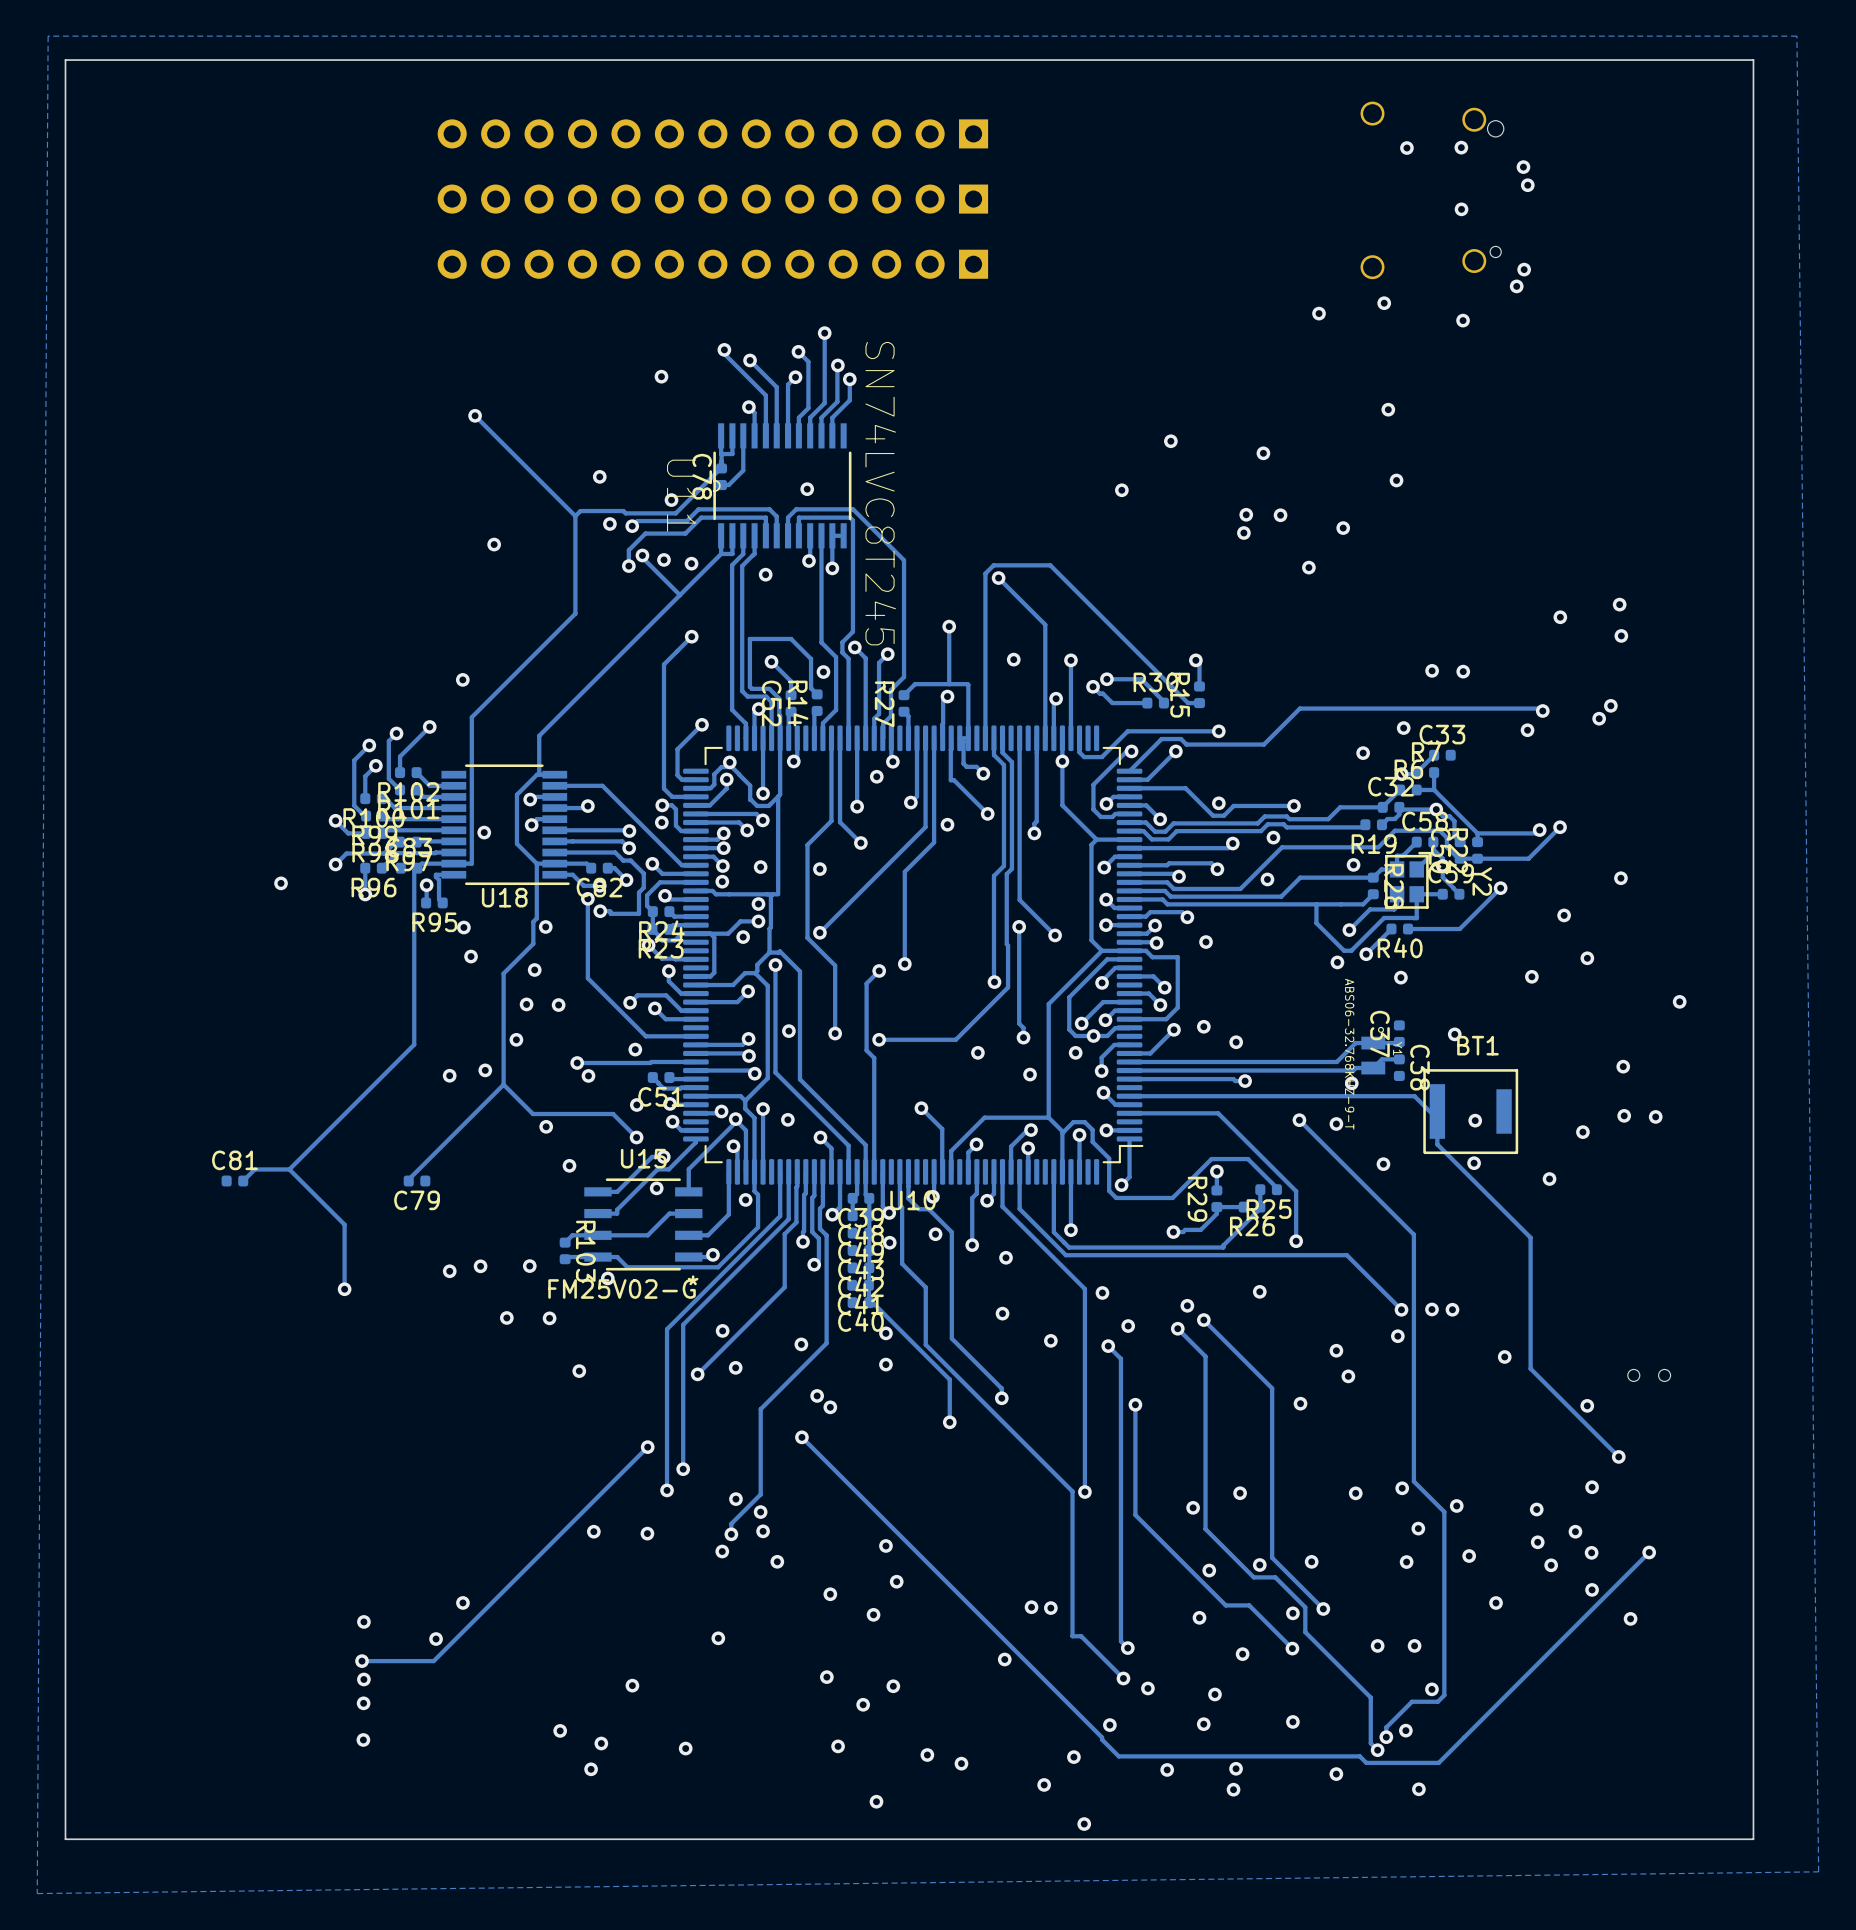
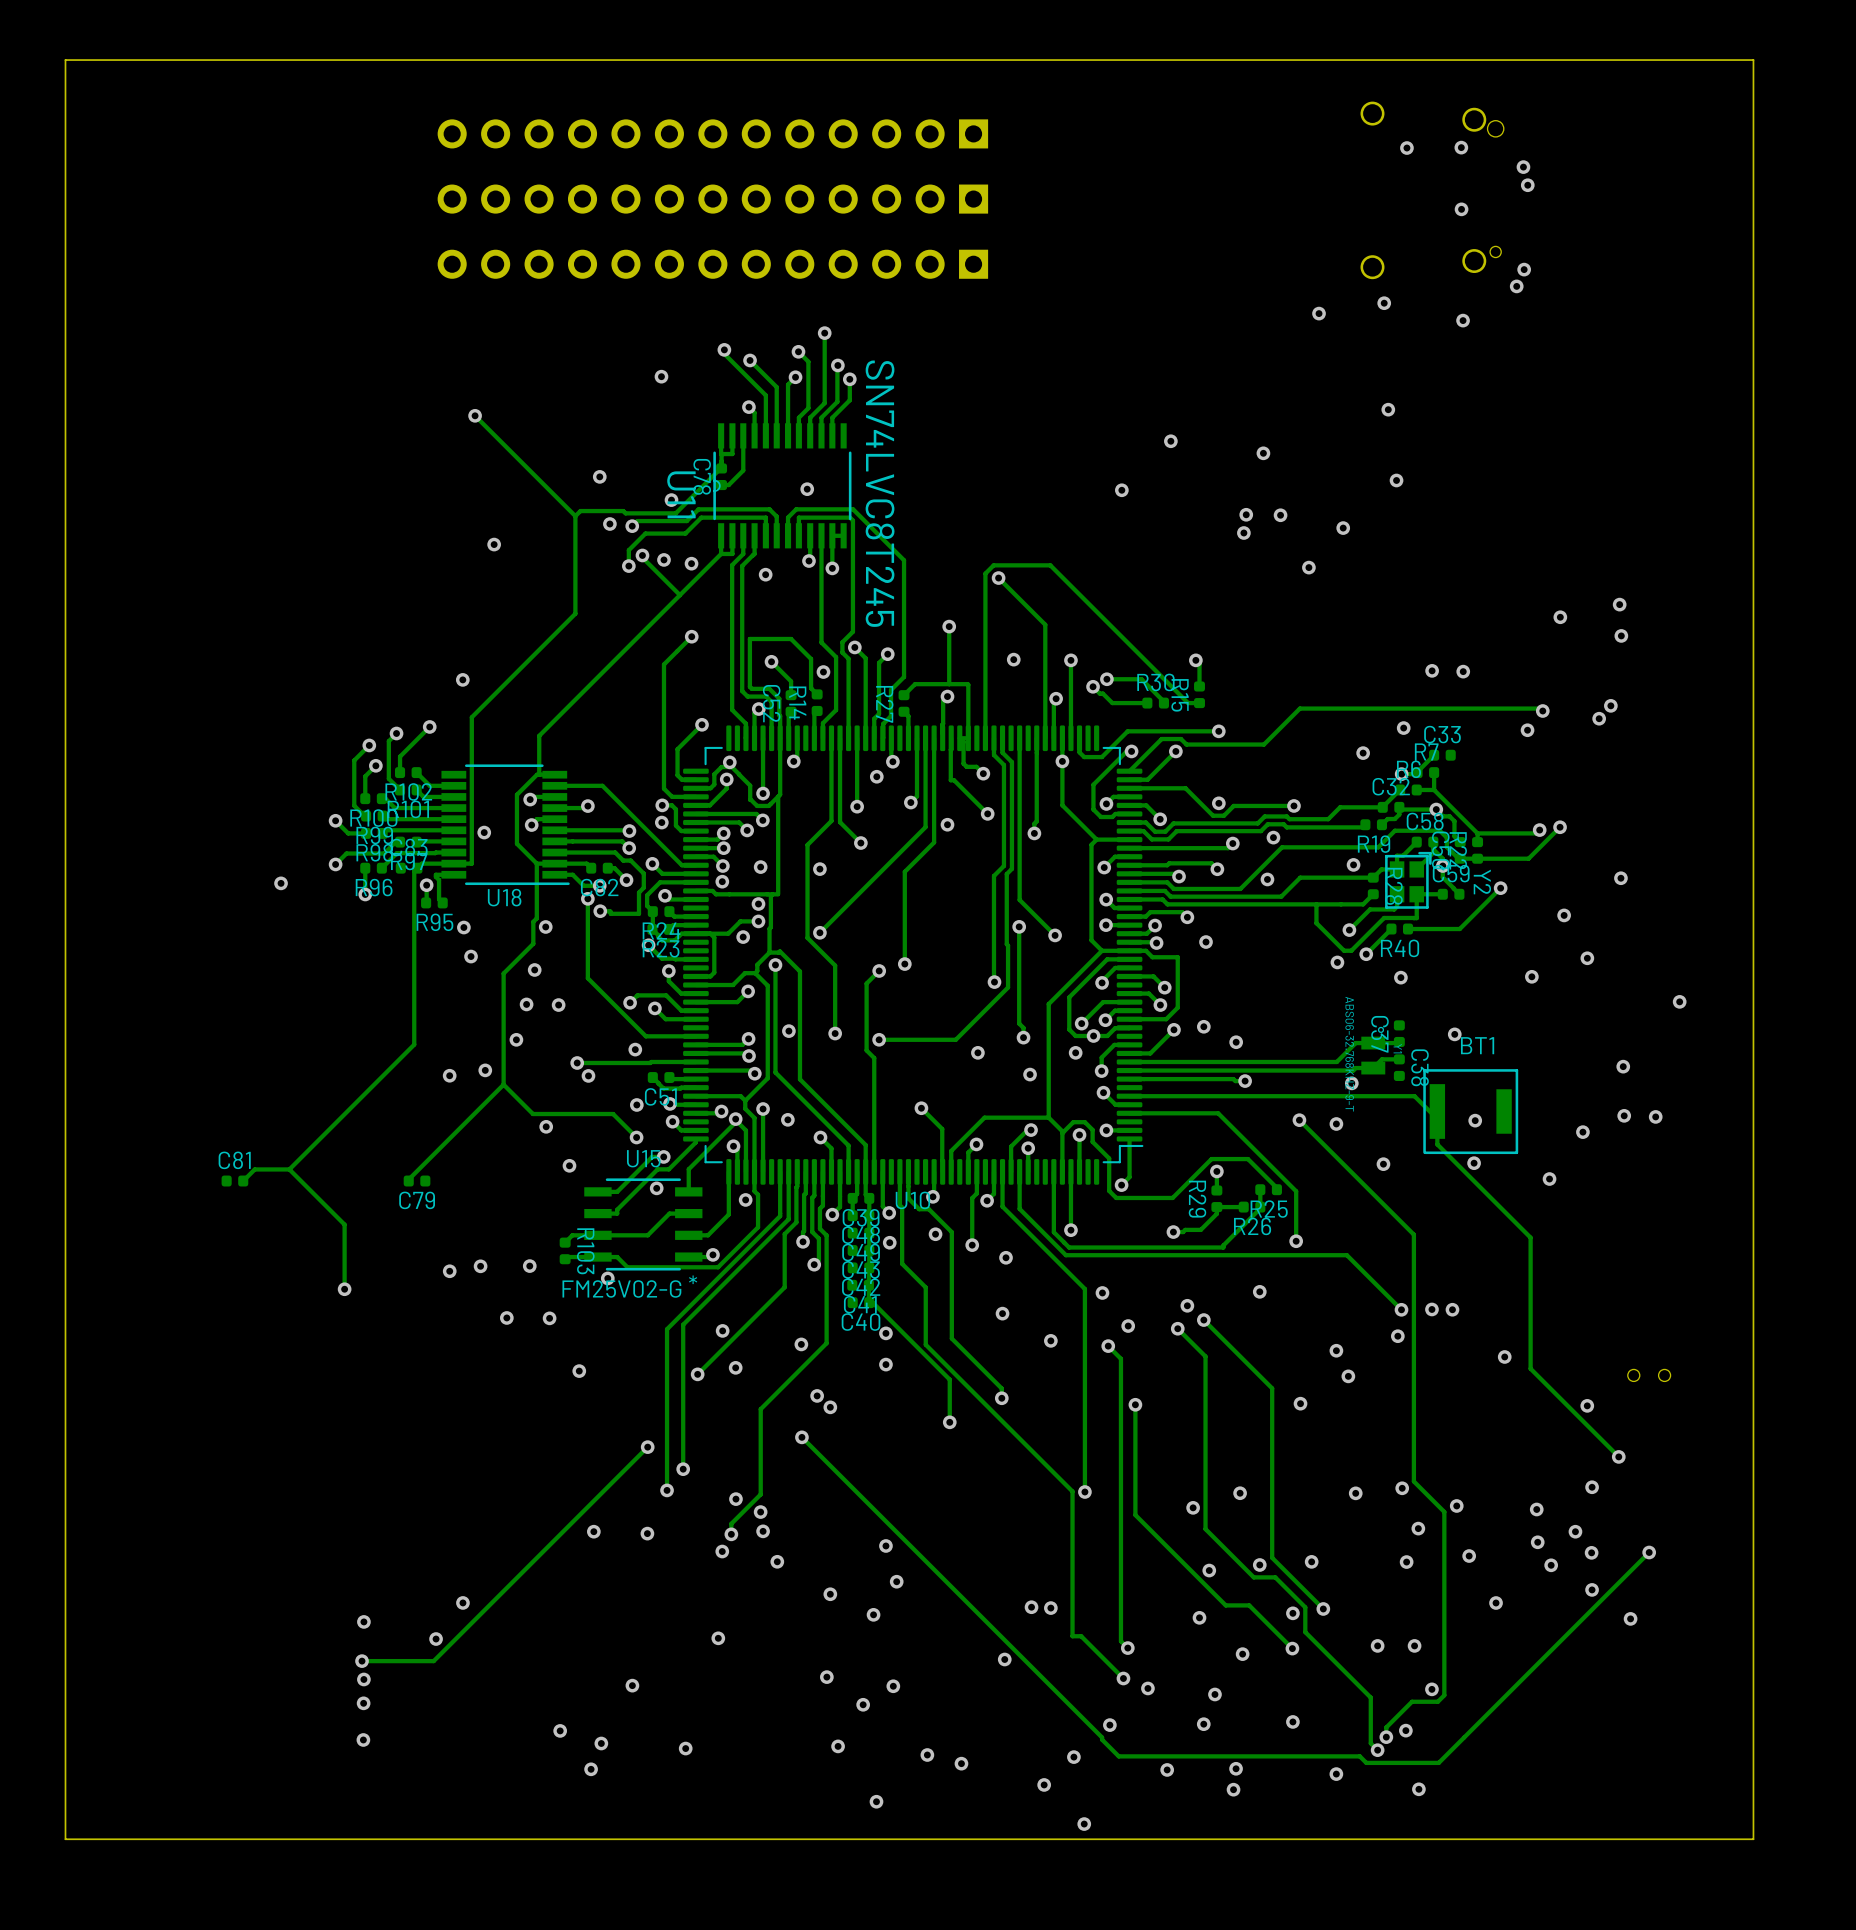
zone outline: (1796, 36) (48, 36) (37, 1893) (1818, 1871) (1796, 36) -> none

